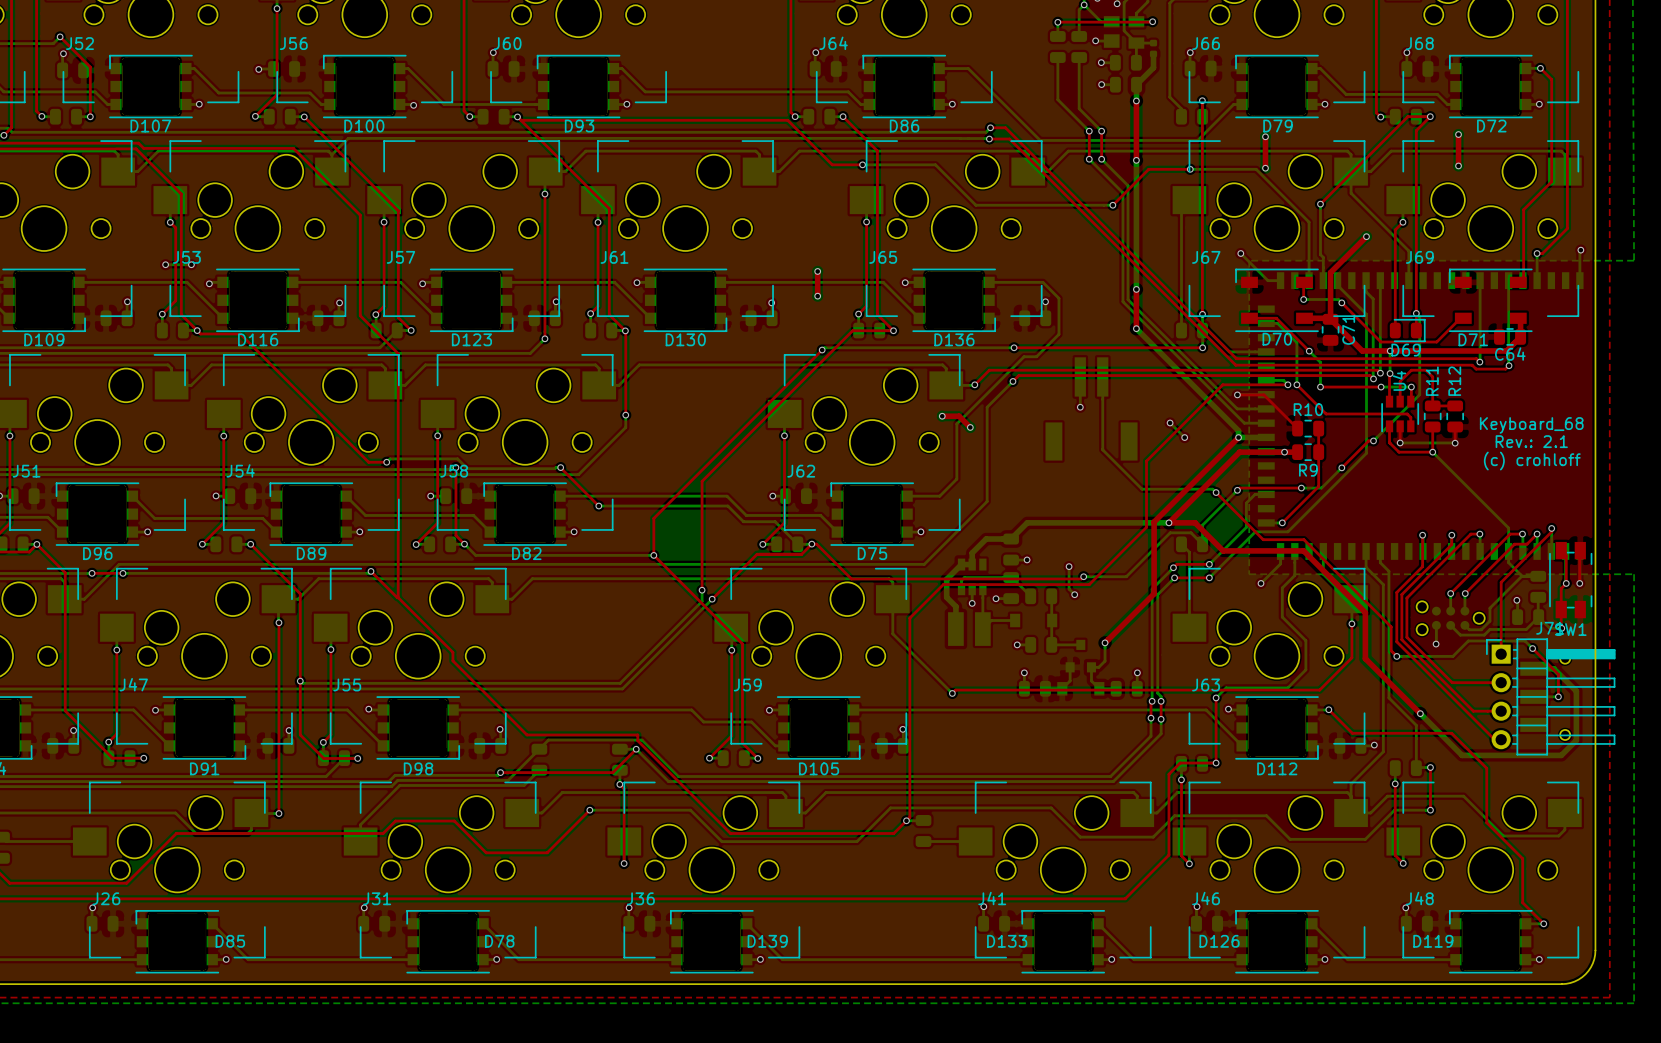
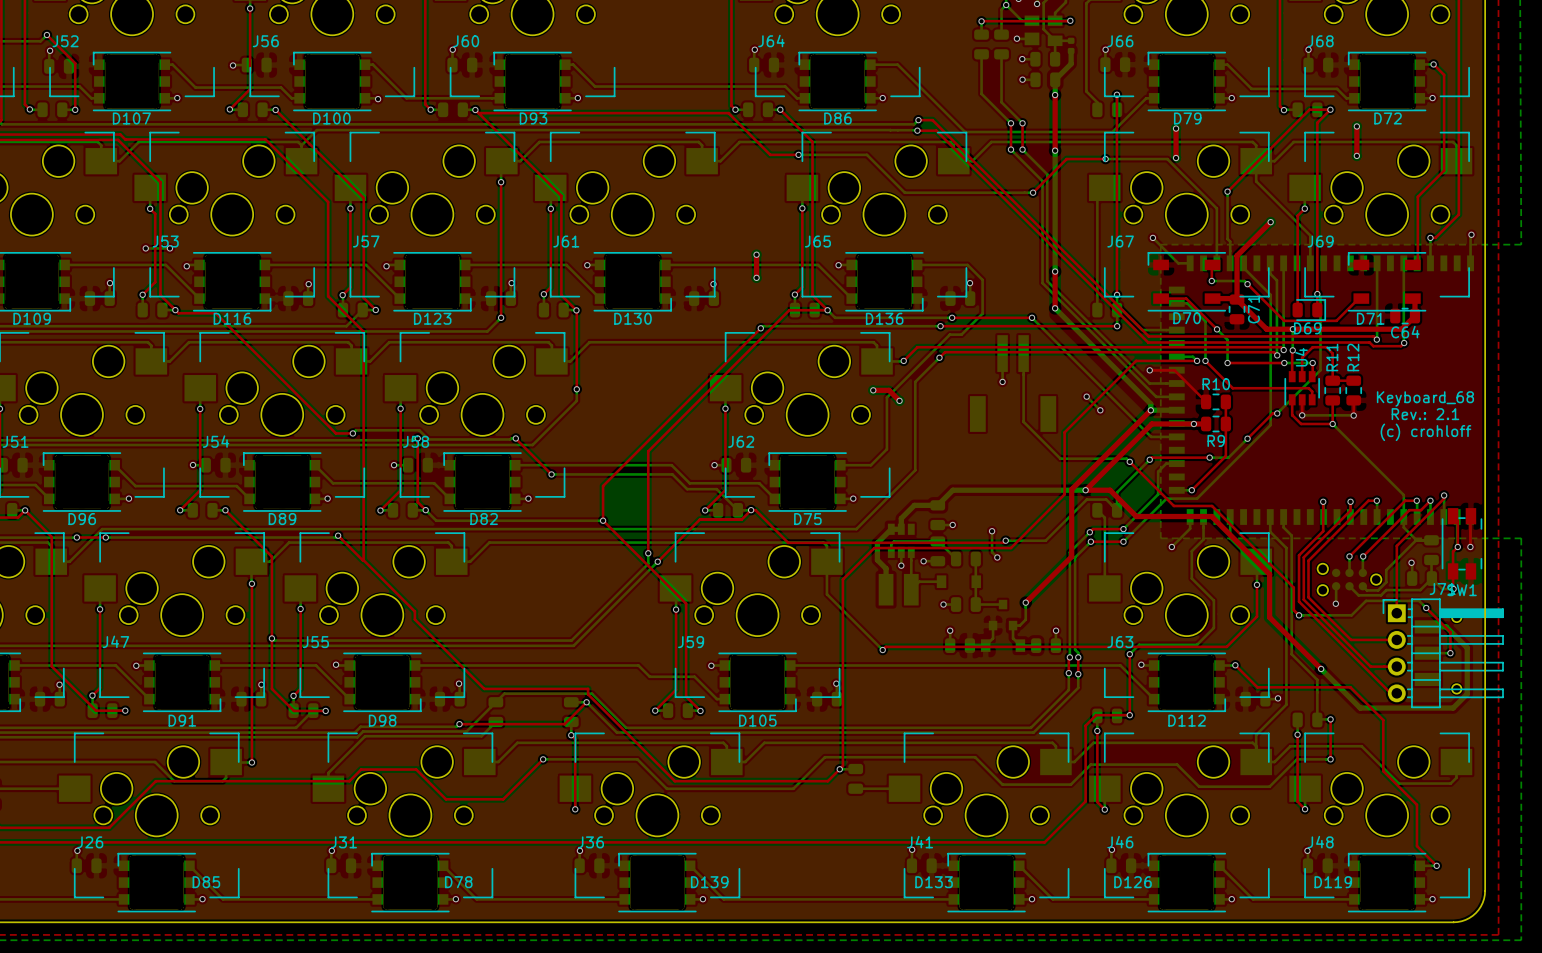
bottom track: none -> (827, 310) (835, 317) (952, 317)
top track: none -> (952, 317) (1032, 317)
via: none -> (952, 317)
bottom track: none -> (1032, 317) (1151, 436) (1176, 436)
via: none -> (1032, 317)

